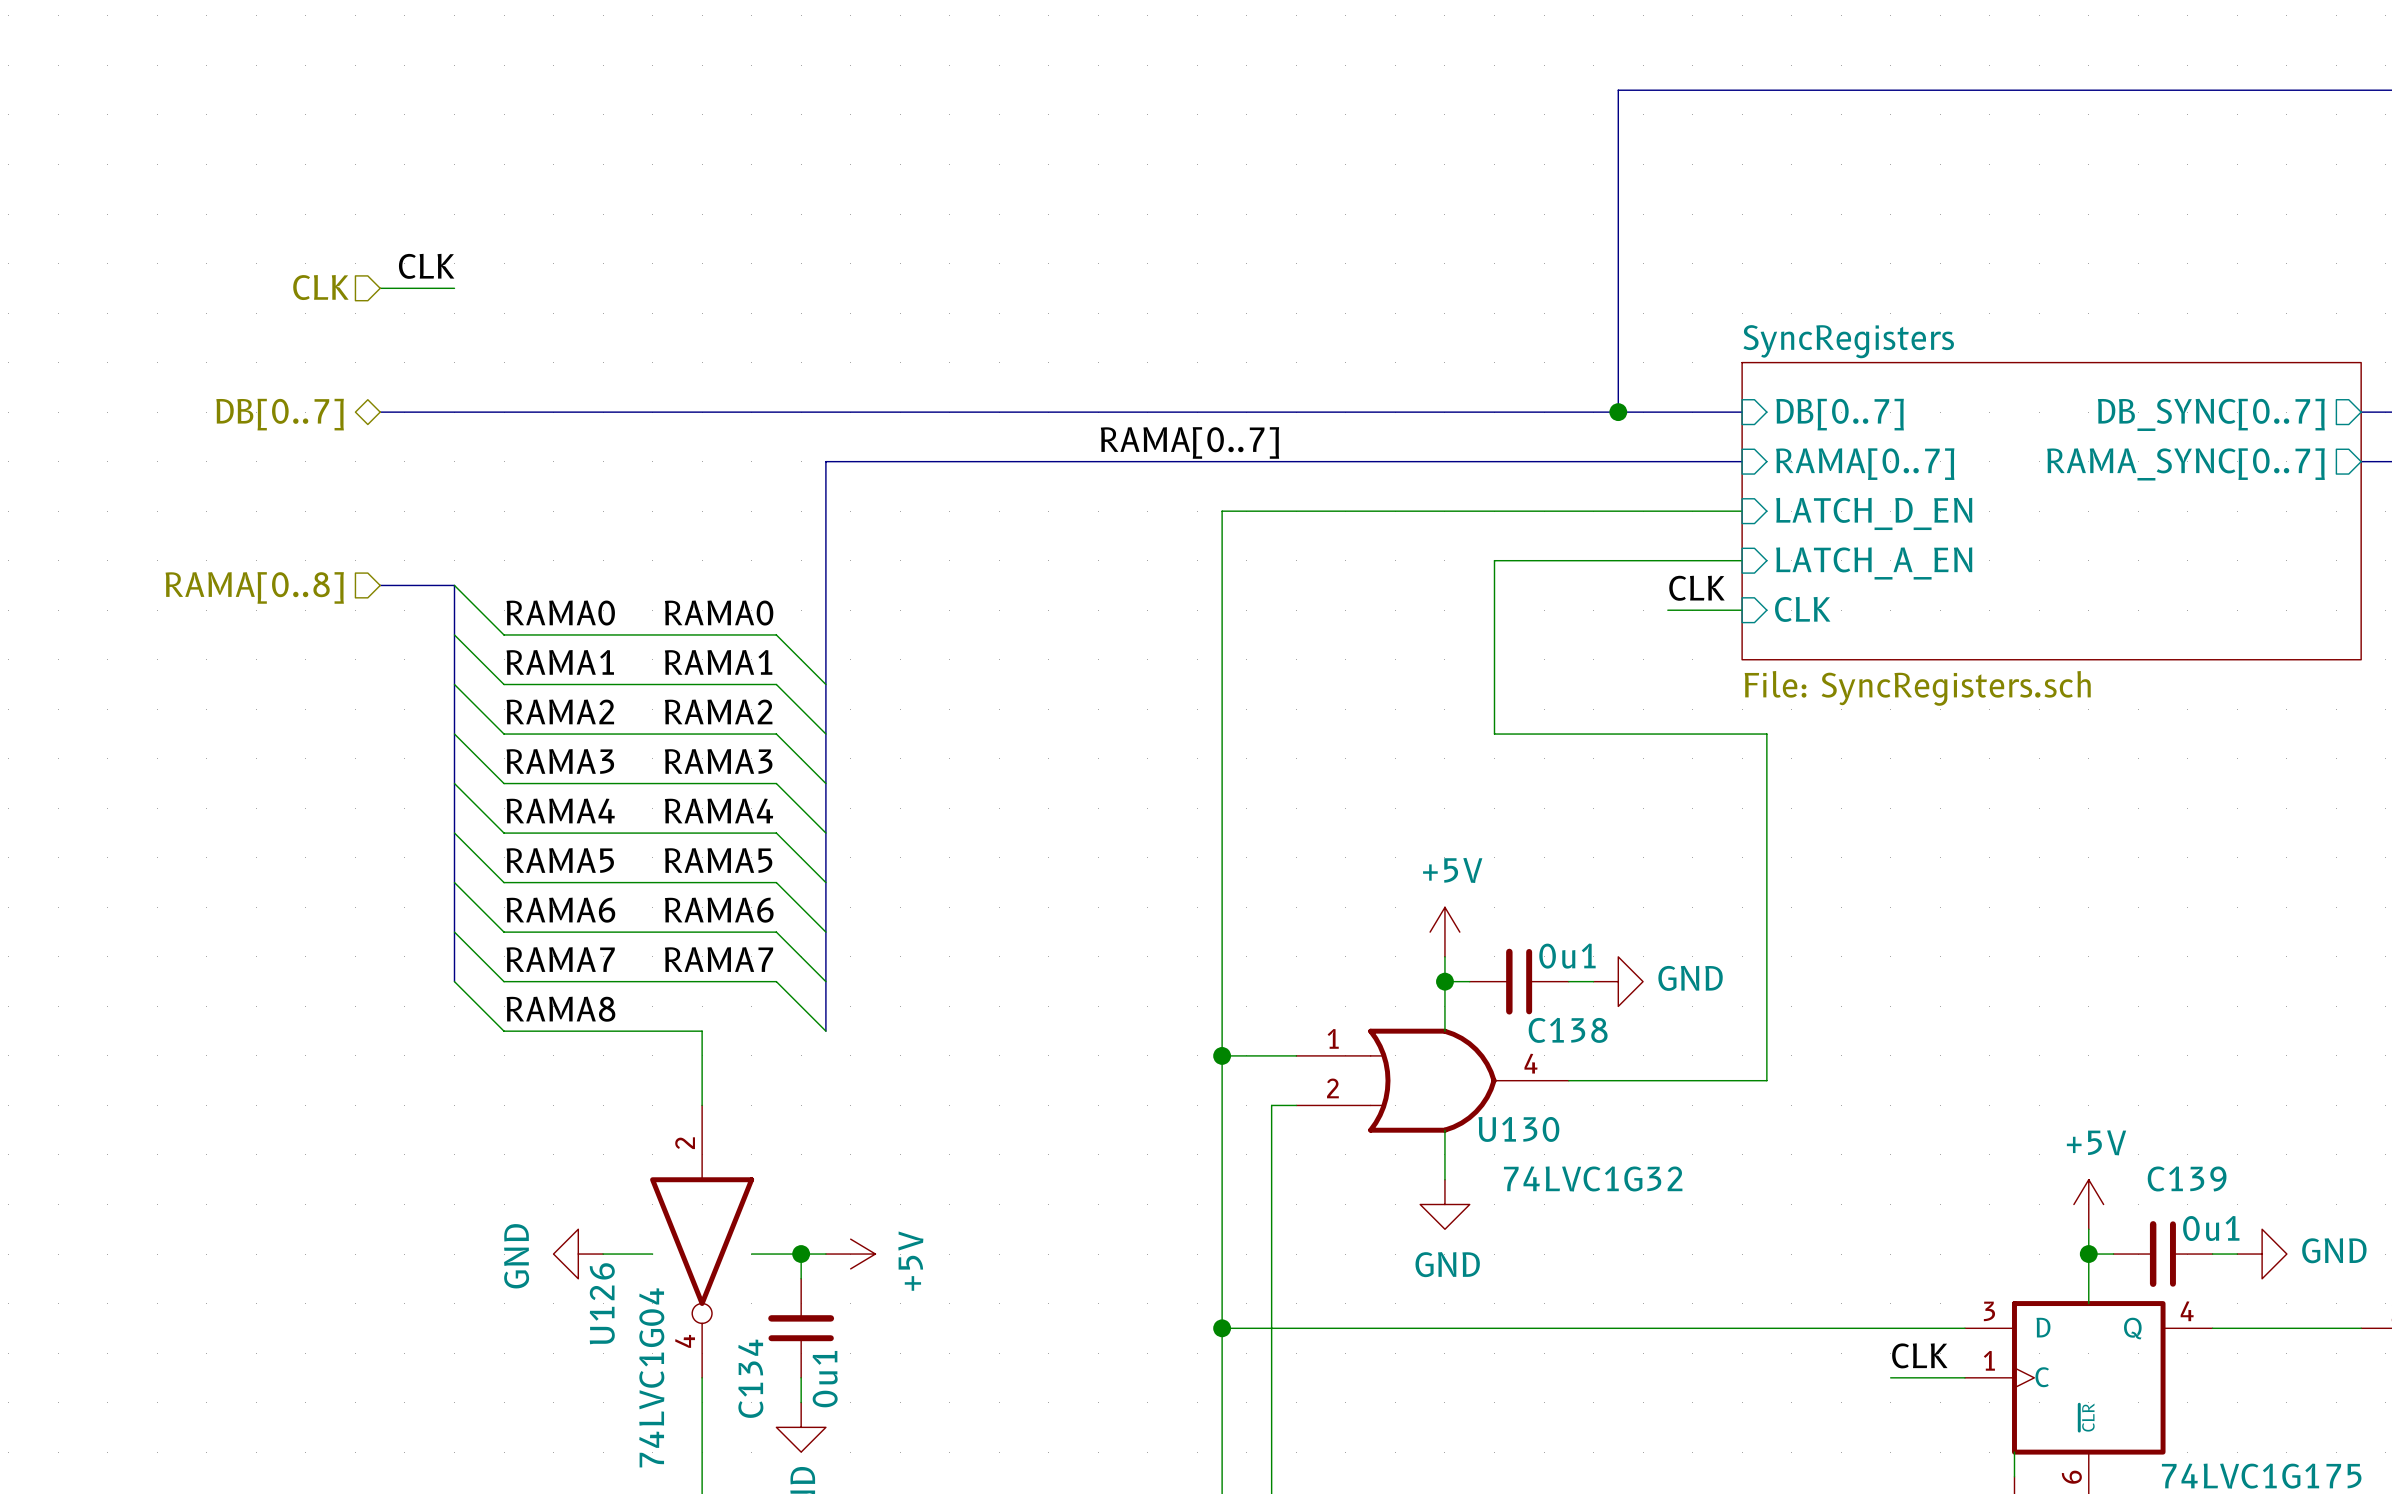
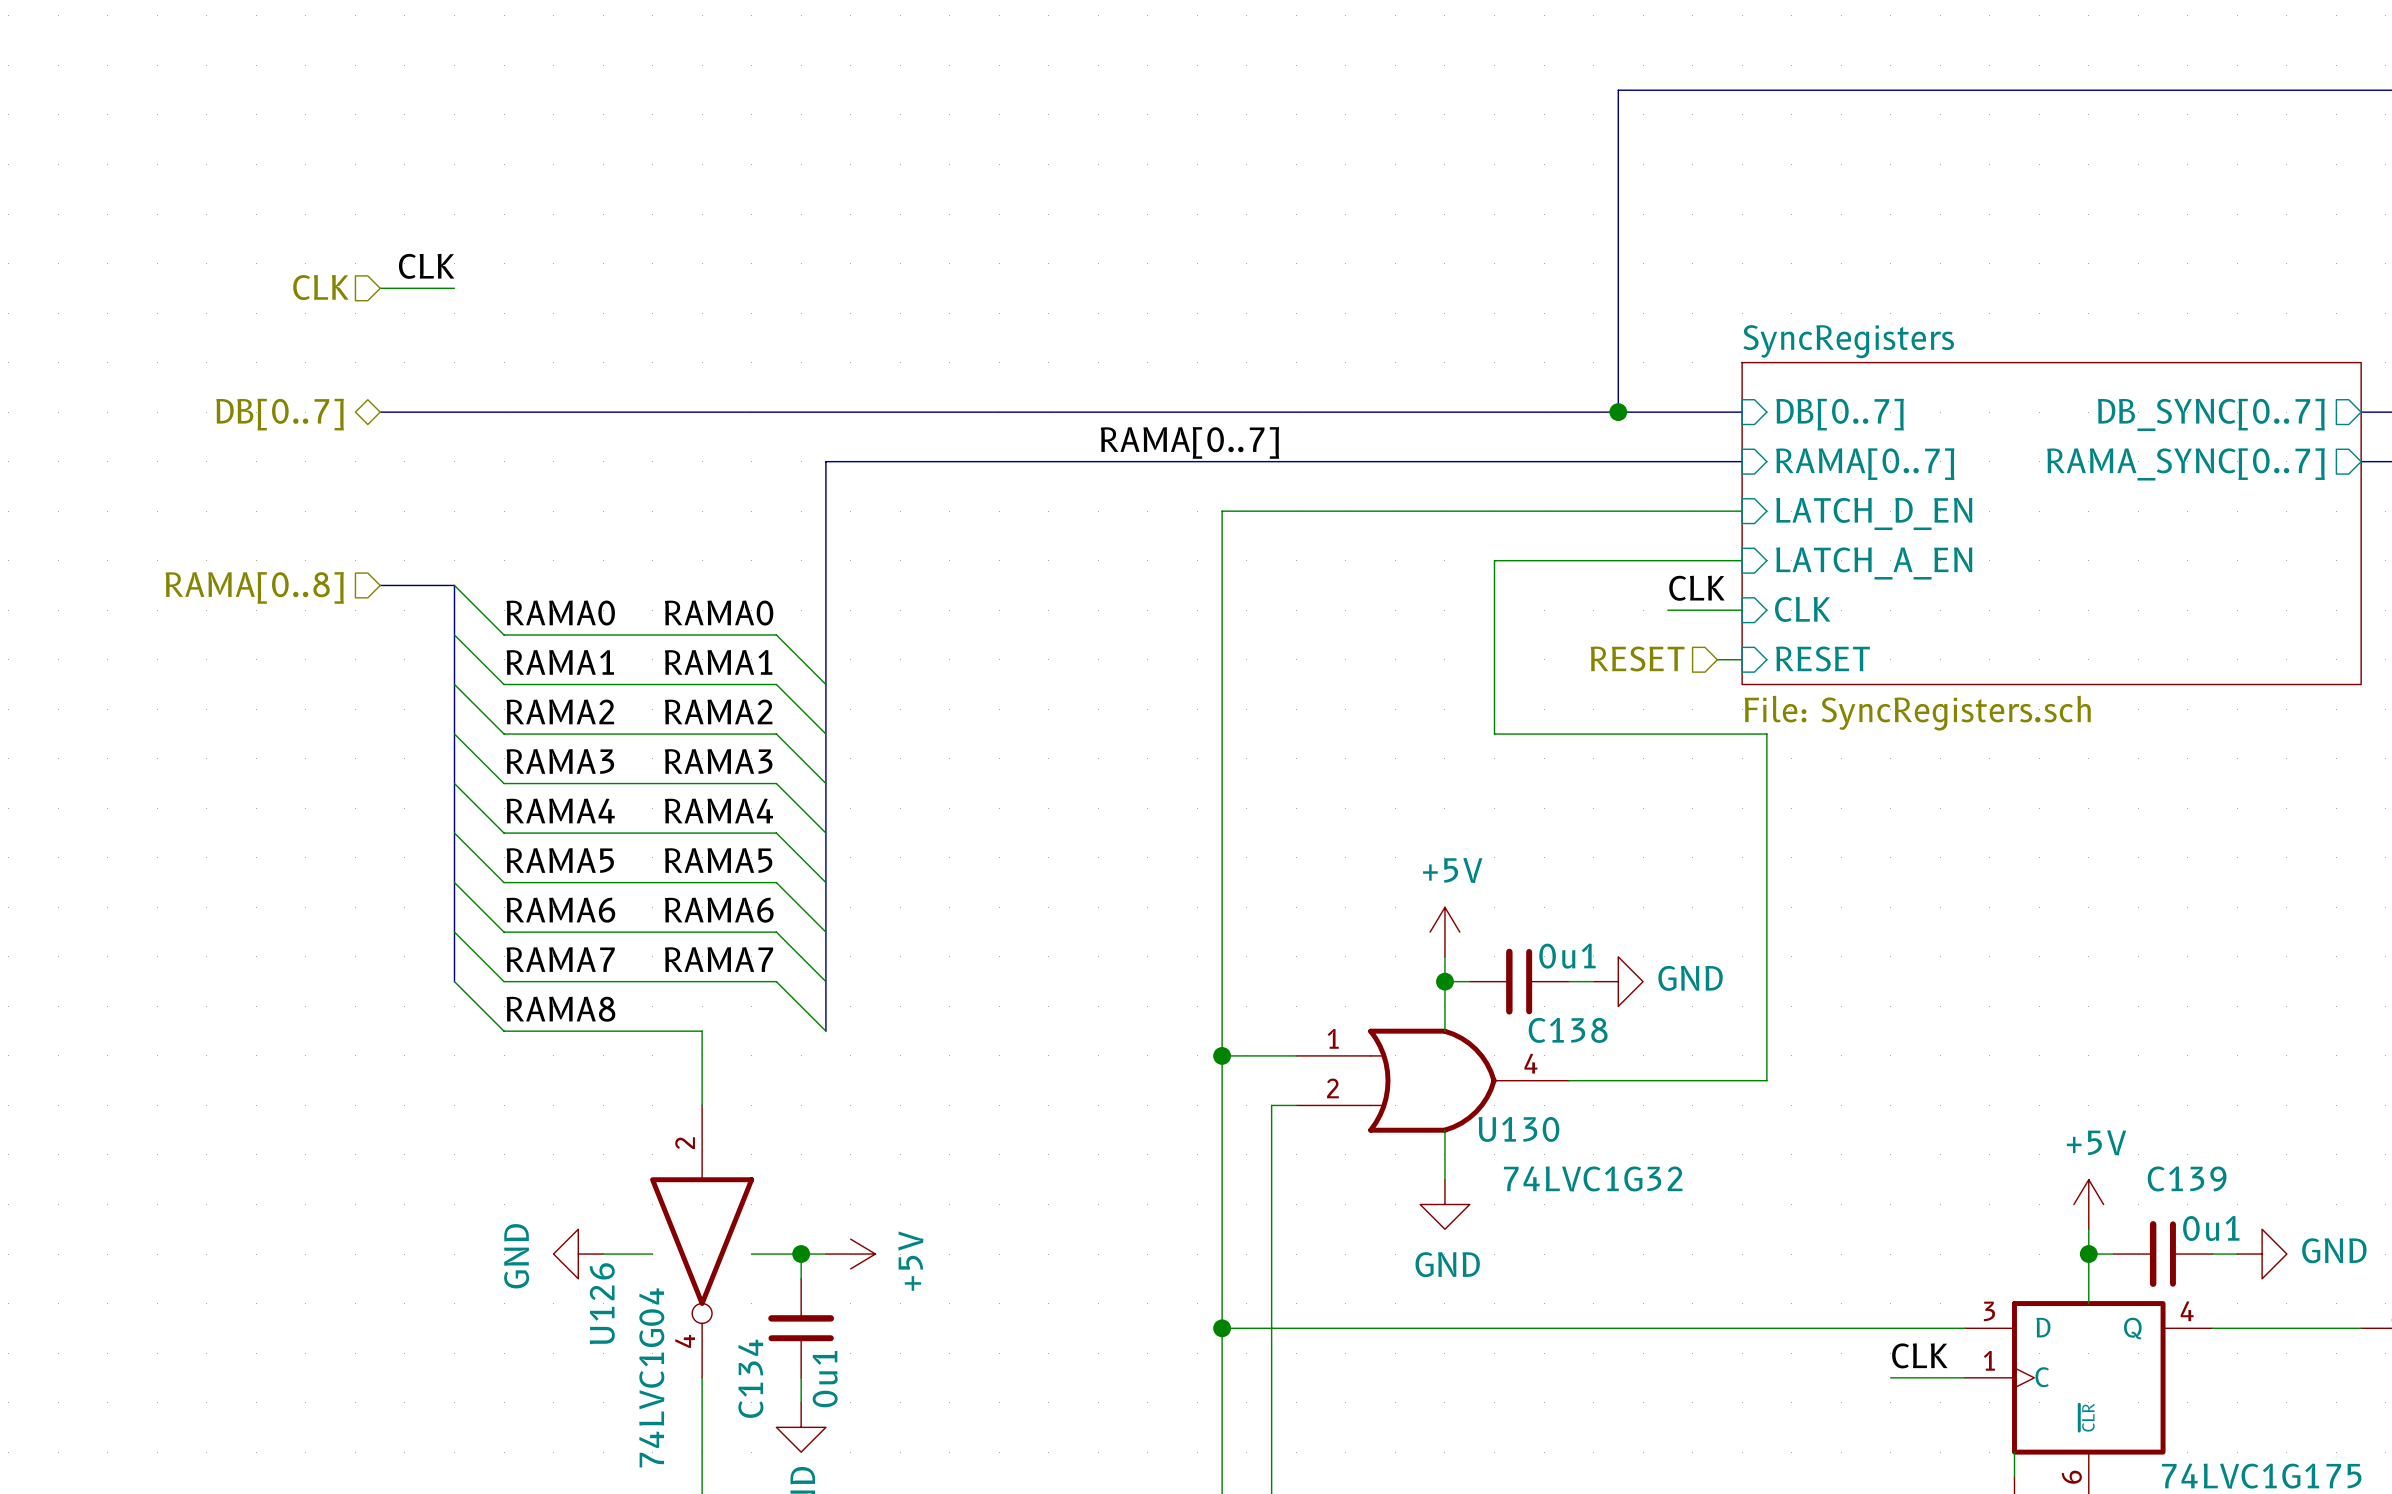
sheet SyncRegisters shape: [1742, 362, 2362, 660] -> [1742, 362, 2362, 685]
hierarchical label: none -> RESET (1637, 658)
sheet pin: none -> RESET (1822, 658)
wire: none -> (1717, 659) (1742, 659)

